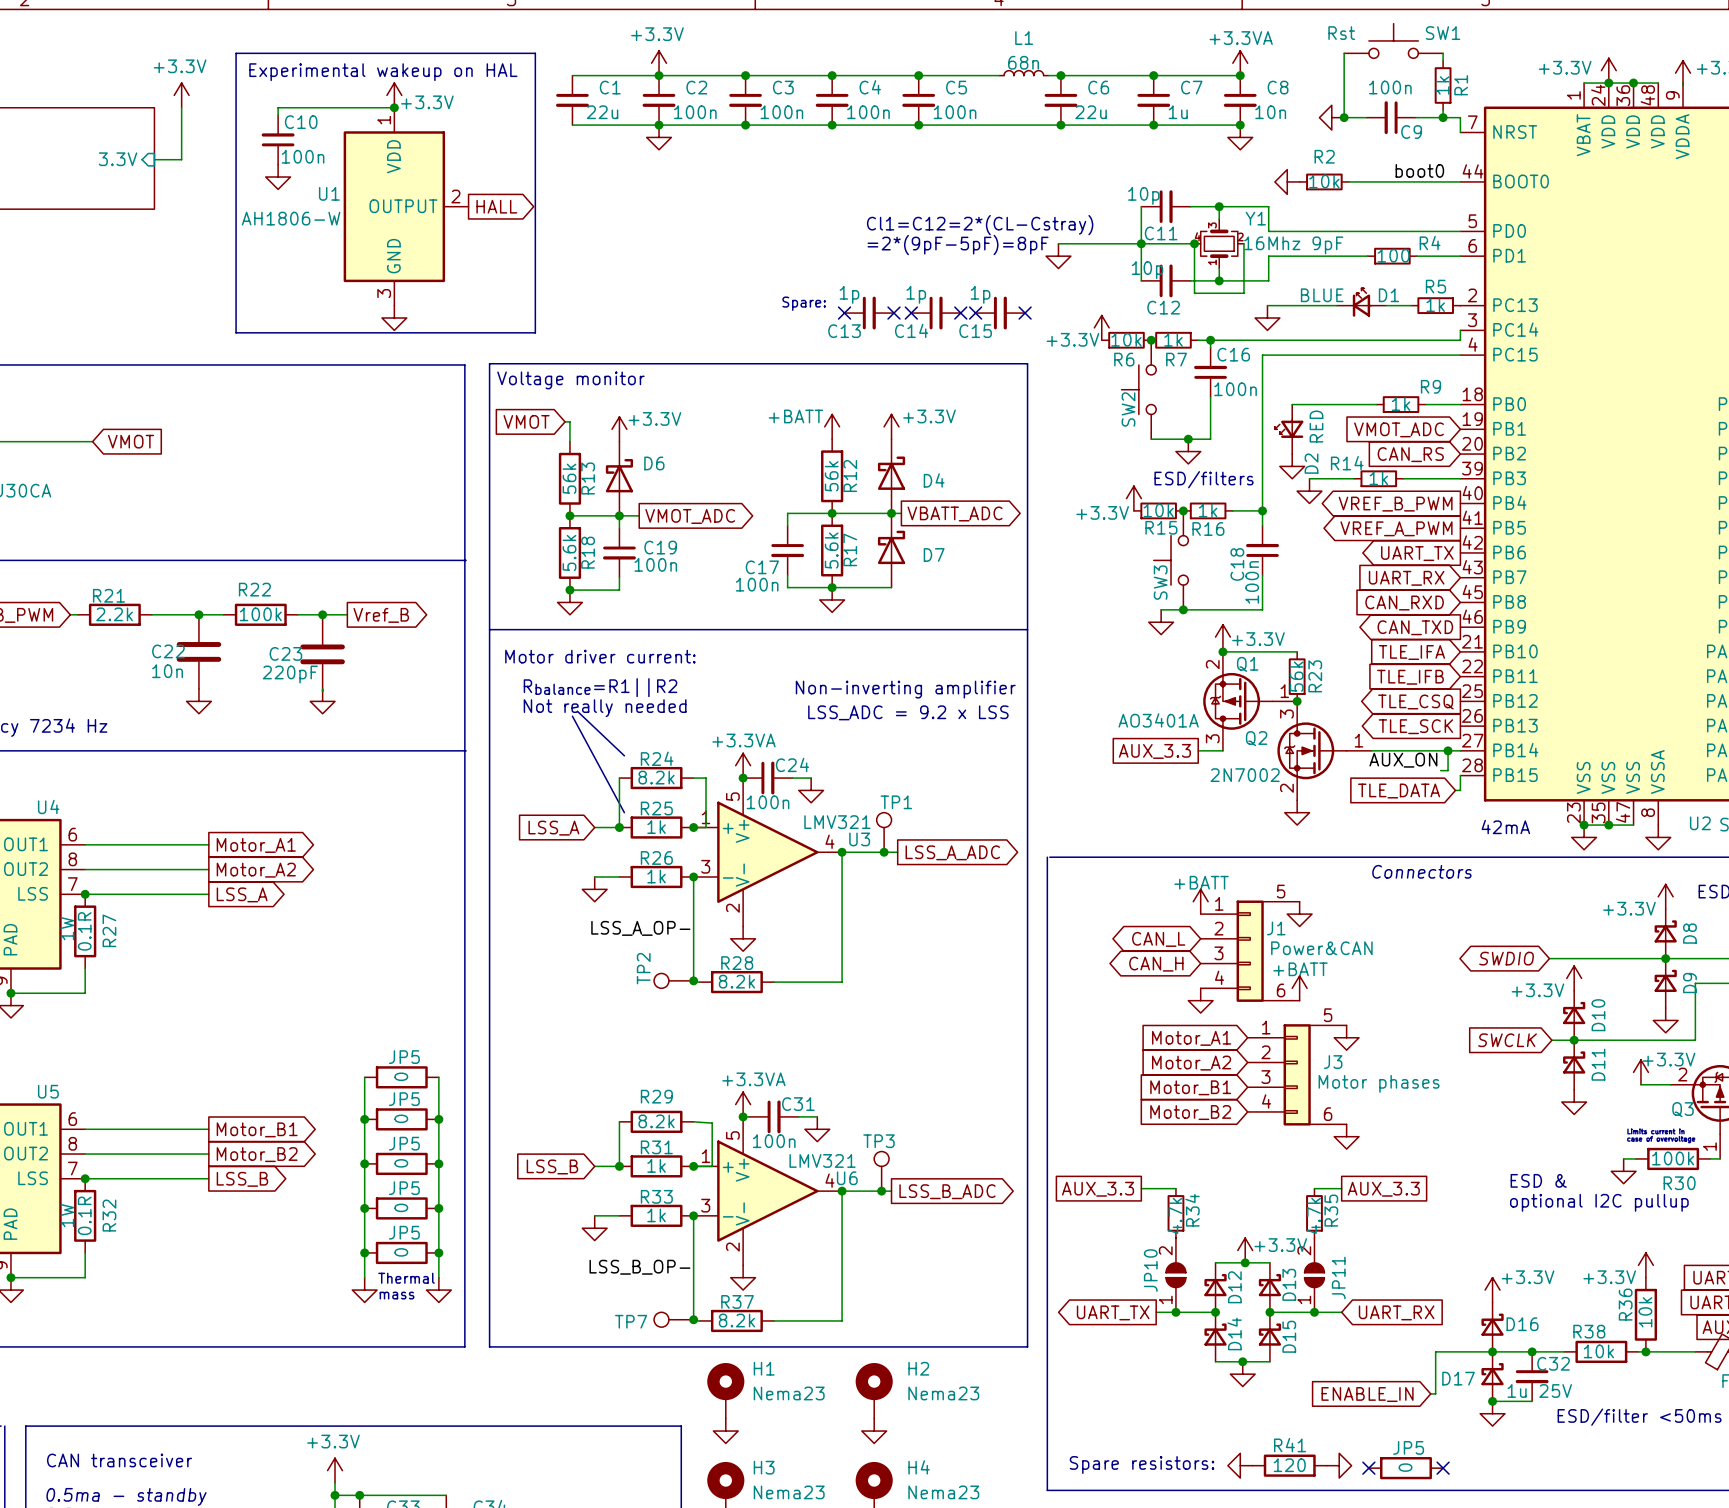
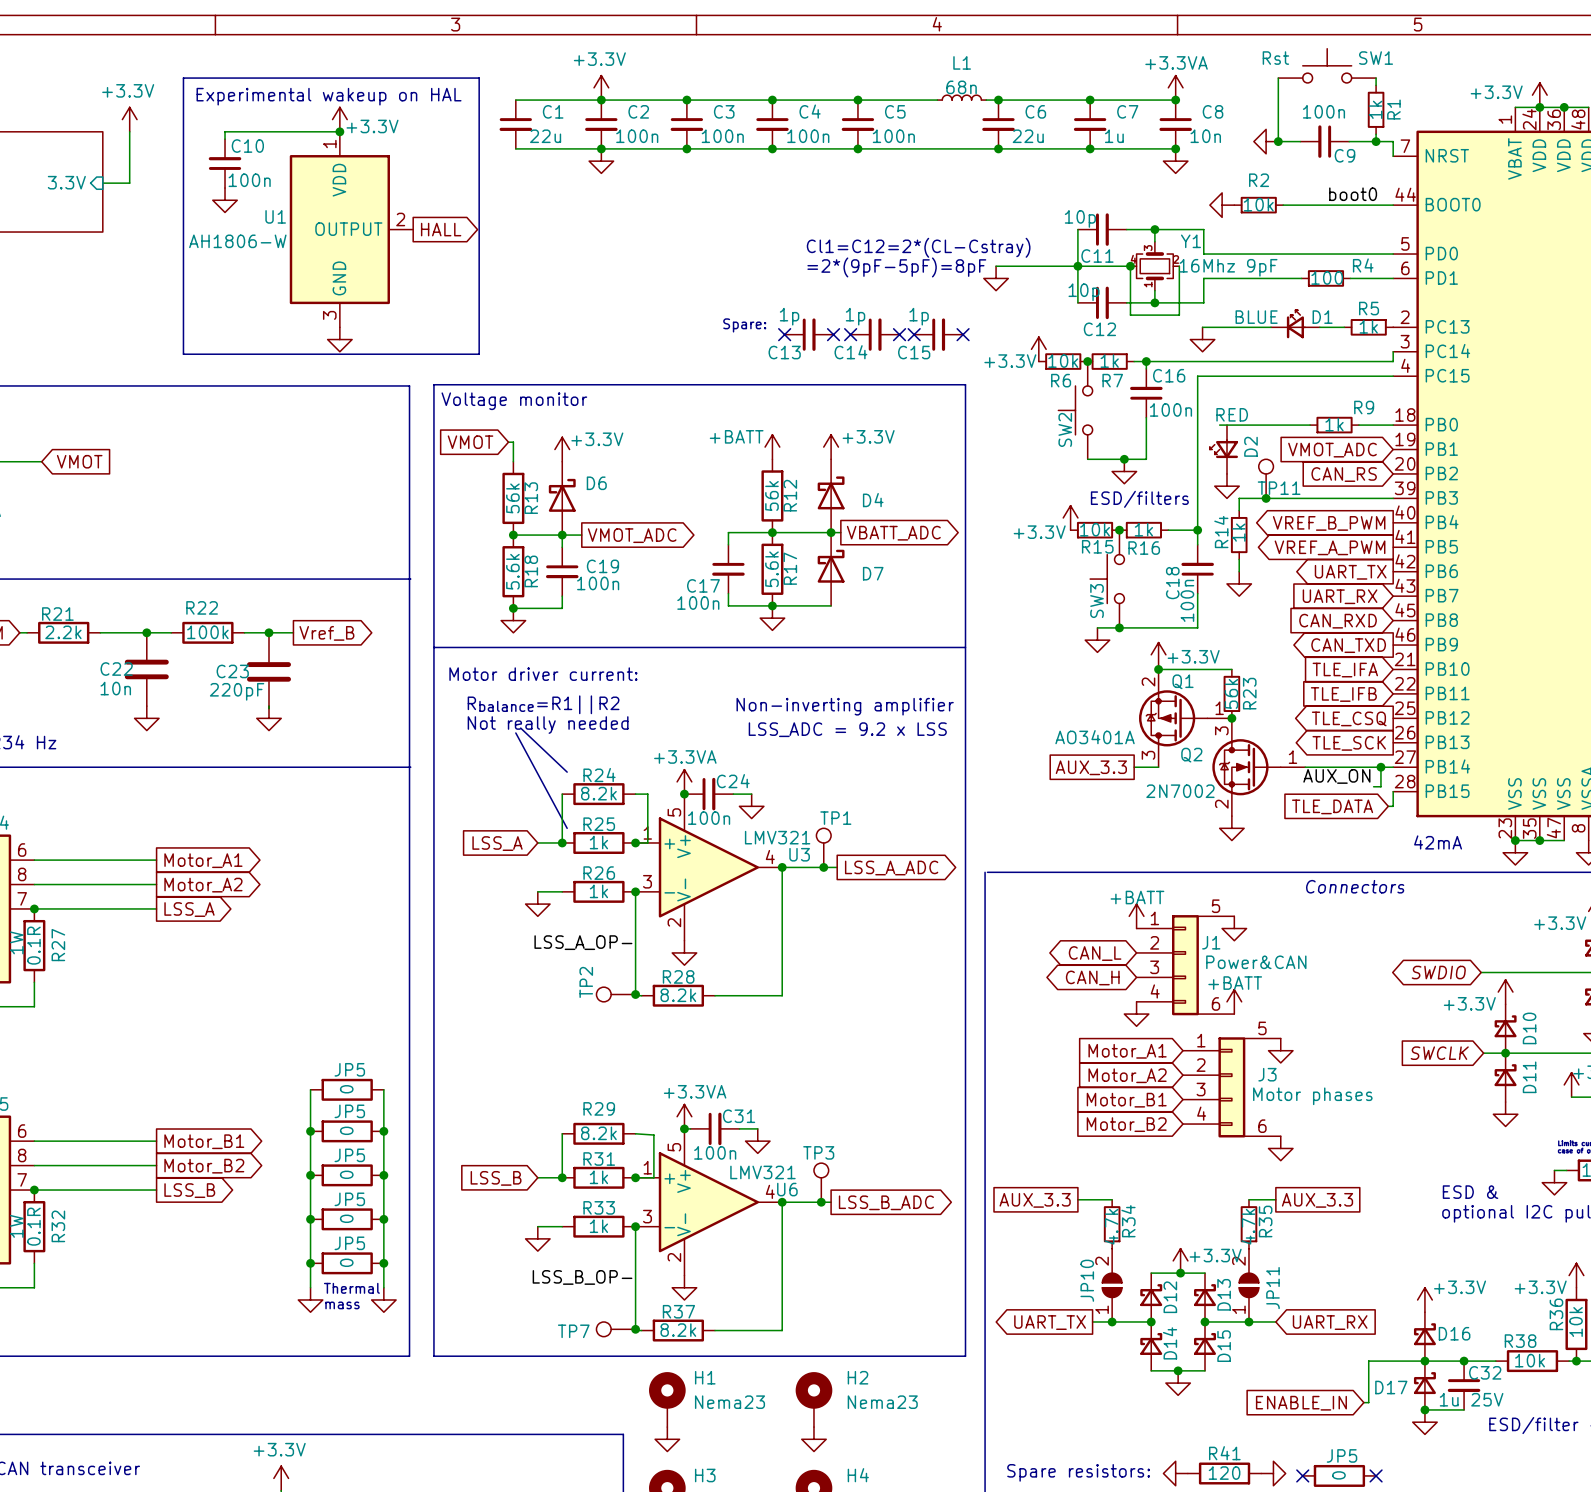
wire: none -> (1219, 425) (1226, 425)
D2 value rotation: 0° (1316, 426) -> 90° clockwise (1232, 414)
TP11: none -> (1266, 478)
D2 name position: D2 (1311, 463) -> D2 (1250, 446)
wire: none -> (1244, 498) (1239, 498) (1239, 510)
junction: none -> (1266, 498)
wire: none -> (1288, 498) (1336, 498)
R14 rotation: 0° (1378, 478) -> 90° clockwise (1239, 535)
R14 position: (1378, 478) -> (1239, 535)
power symbol position: (1309, 491) -> (1239, 583)
wire: none -> (1239, 559) (1239, 571)

